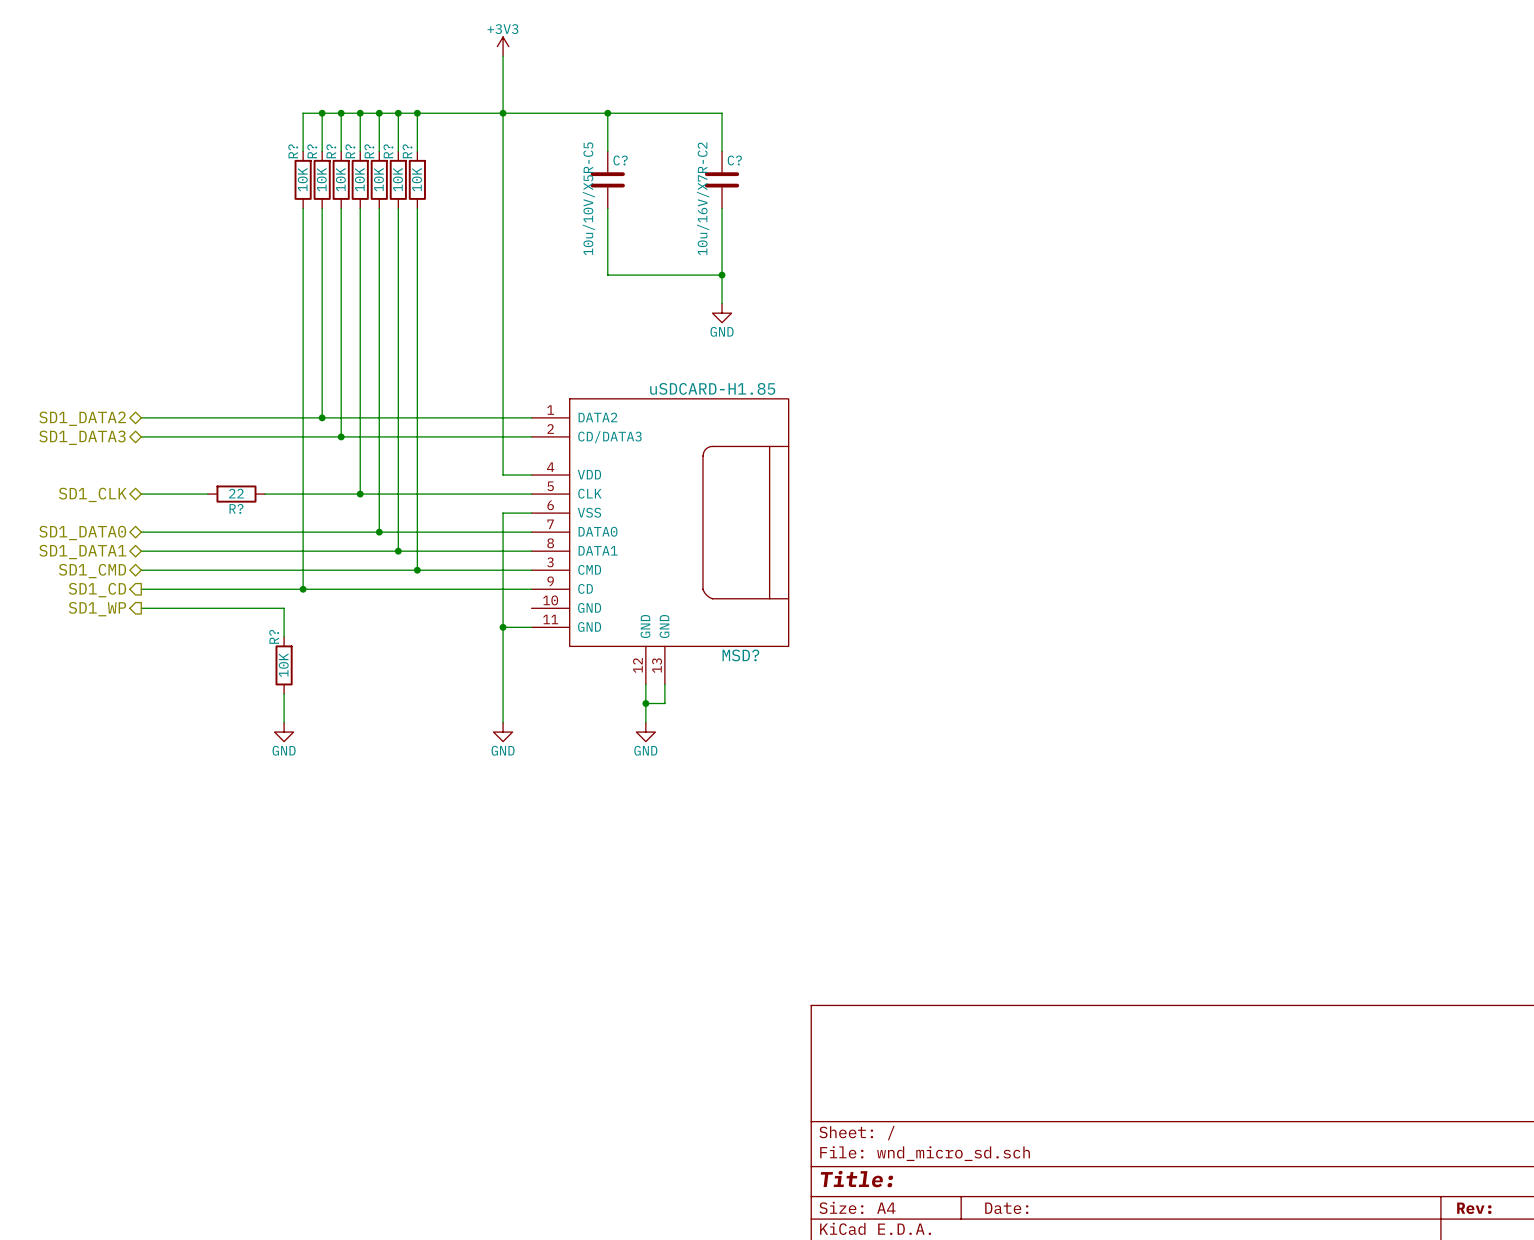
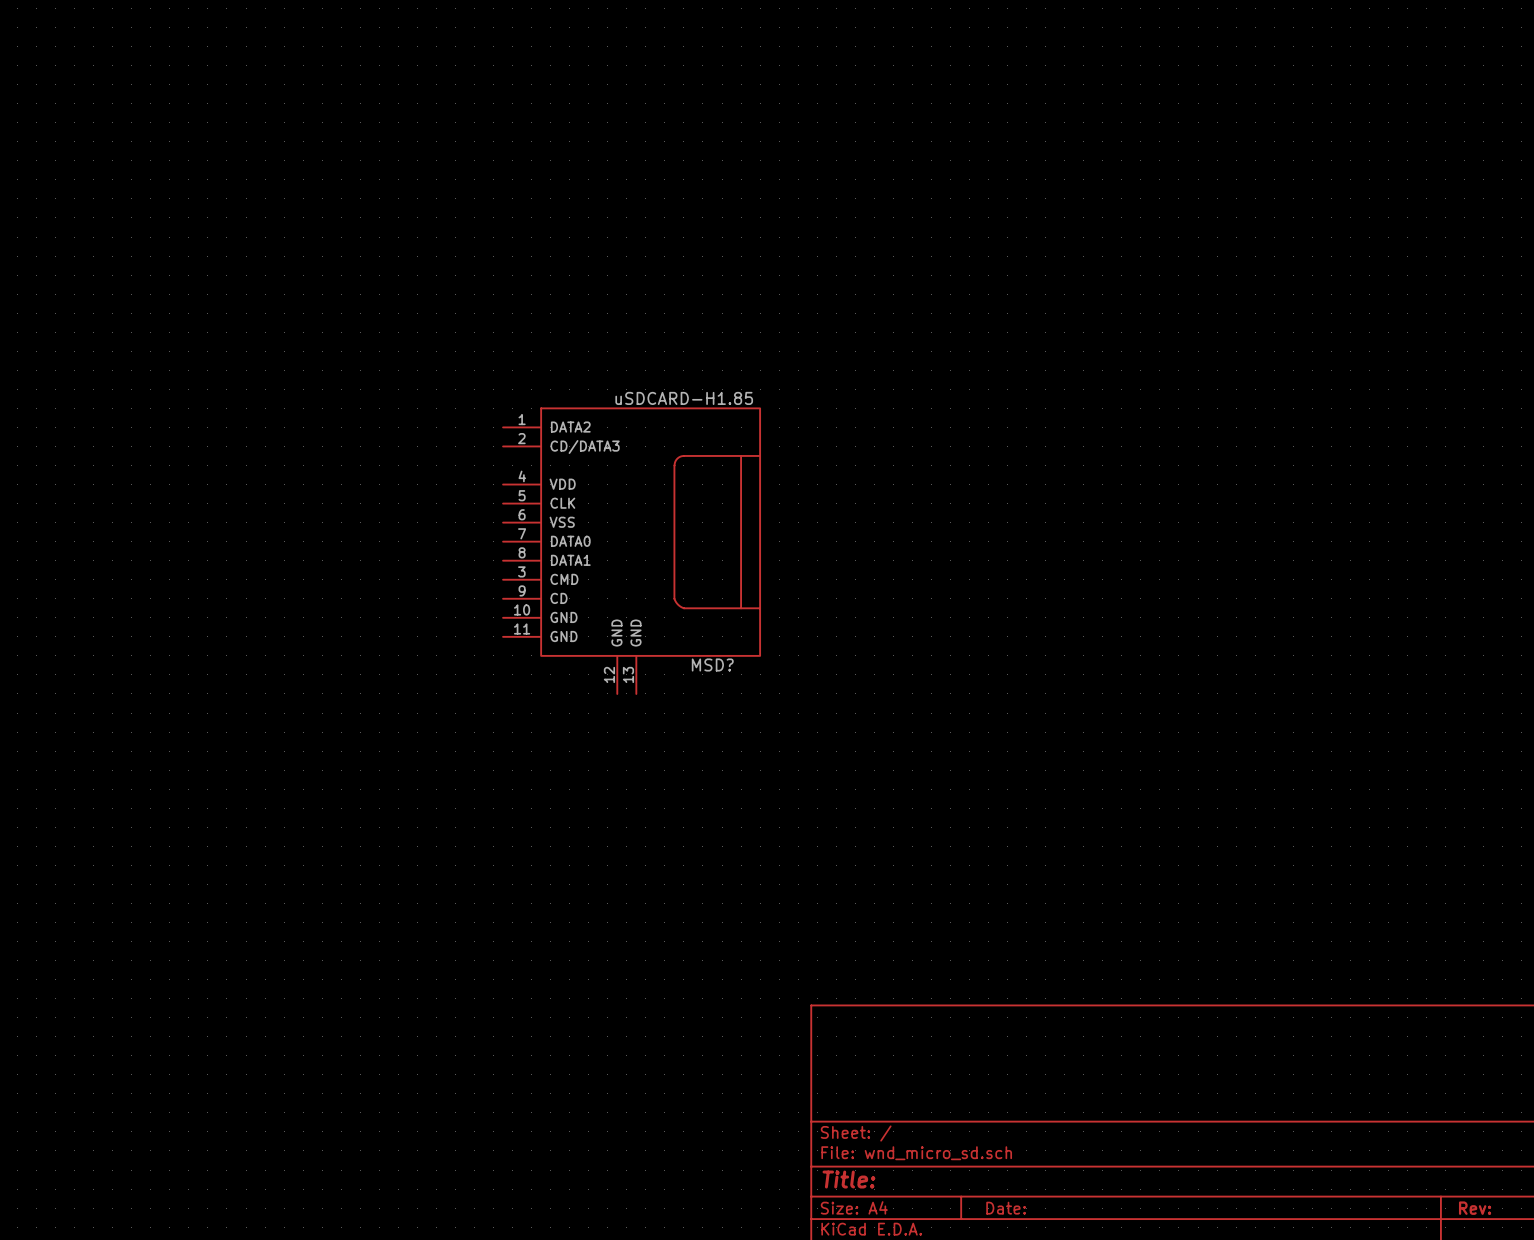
power symbol: +3V3 (503, 46) -> none
wire: (503, 56) (503, 475) (531, 475) -> none
wire: (322, 113) (322, 151) -> none
junction: (322, 113) -> none
wire: (341, 113) (341, 151) -> none
junction: (341, 113) -> none
wire: (360, 113) (360, 151) -> none
junction: (360, 113) -> none
wire: (379, 113) (379, 151) -> none
junction: (379, 113) -> none
wire: (398, 113) (398, 151) -> none
junction: (398, 113) -> none
wire: (417, 113) (417, 151) -> none
junction: (417, 113) -> none
junction: (503, 113) -> none
wire: (607, 113) (607, 151) -> none
junction: (607, 113) -> none
wire: (303, 151) (303, 113) (722, 113) (722, 151) -> none
R?: 10K (303, 179) -> none
R?: 10K (322, 179) -> none
R?: 10K (341, 179) -> none
R?: 10K (360, 179) -> none
R?: 10K (379, 179) -> none
R?: 10K (398, 179) -> none
R?: 10K (417, 179) -> none
C?: 10u/10V/X5R-C5 (607, 179) -> none
C?: 10u/16V/X7R-C2 (722, 179) -> none
wire: (303, 208) (303, 589) -> none
wire: (322, 208) (322, 417) -> none
wire: (341, 208) (341, 436) -> none
wire: (360, 208) (360, 494) -> none
wire: (379, 208) (379, 532) -> none
wire: (398, 208) (398, 551) -> none
wire: (417, 208) (417, 570) -> none
wire: (607, 208) (607, 275) (722, 275) -> none
wire: (722, 208) (722, 303) -> none
junction: (722, 275) -> none
power symbol: GND (722, 313) -> none
wire: (141, 417) (531, 417) -> none
junction: (322, 417) -> none
hierarchical label: SD1_DATA2 (82, 418) -> none
wire: (141, 436) (531, 436) -> none
junction: (341, 436) -> none
hierarchical label: SD1_DATA3 (82, 437) -> none
hierarchical label: SD1_CLK (92, 494) -> none
wire: (141, 494) (207, 494) -> none
R?: 22 (236, 494) -> none
wire: (265, 494) (531, 494) -> none
junction: (360, 494) -> none
wire: (531, 513) (503, 513) (503, 722) -> none
hierarchical label: SD1_DATA0 (82, 532) -> none
wire: (141, 532) (531, 532) -> none
junction: (379, 532) -> none
MSD? position: (660, 541) -> (631, 551)
wire: (141, 551) (531, 551) -> none
junction: (398, 551) -> none
hierarchical label: SD1_DATA1 (82, 552) -> none
wire: (141, 570) (531, 570) -> none
junction: (417, 570) -> none
hierarchical label: SD1_CMD (92, 571) -> none
wire: (141, 589) (531, 589) -> none
junction: (303, 589) -> none
hierarchical label: SD1_CD (97, 590) -> none
wire: (141, 608) (284, 608) (284, 636) -> none
hierarchical label: SD1_WP (97, 609) -> none
wire: (503, 627) (531, 627) -> none
junction: (503, 627) -> none
R?: 10K (284, 665) -> none
wire: (645, 684) (645, 722) -> none
wire: (664, 684) (664, 703) (645, 703) -> none
wire: (284, 693) (284, 722) -> none
junction: (645, 703) -> none
power symbol: GND (284, 732) -> none
power symbol: GND (503, 732) -> none
power symbol: GND (645, 732) -> none

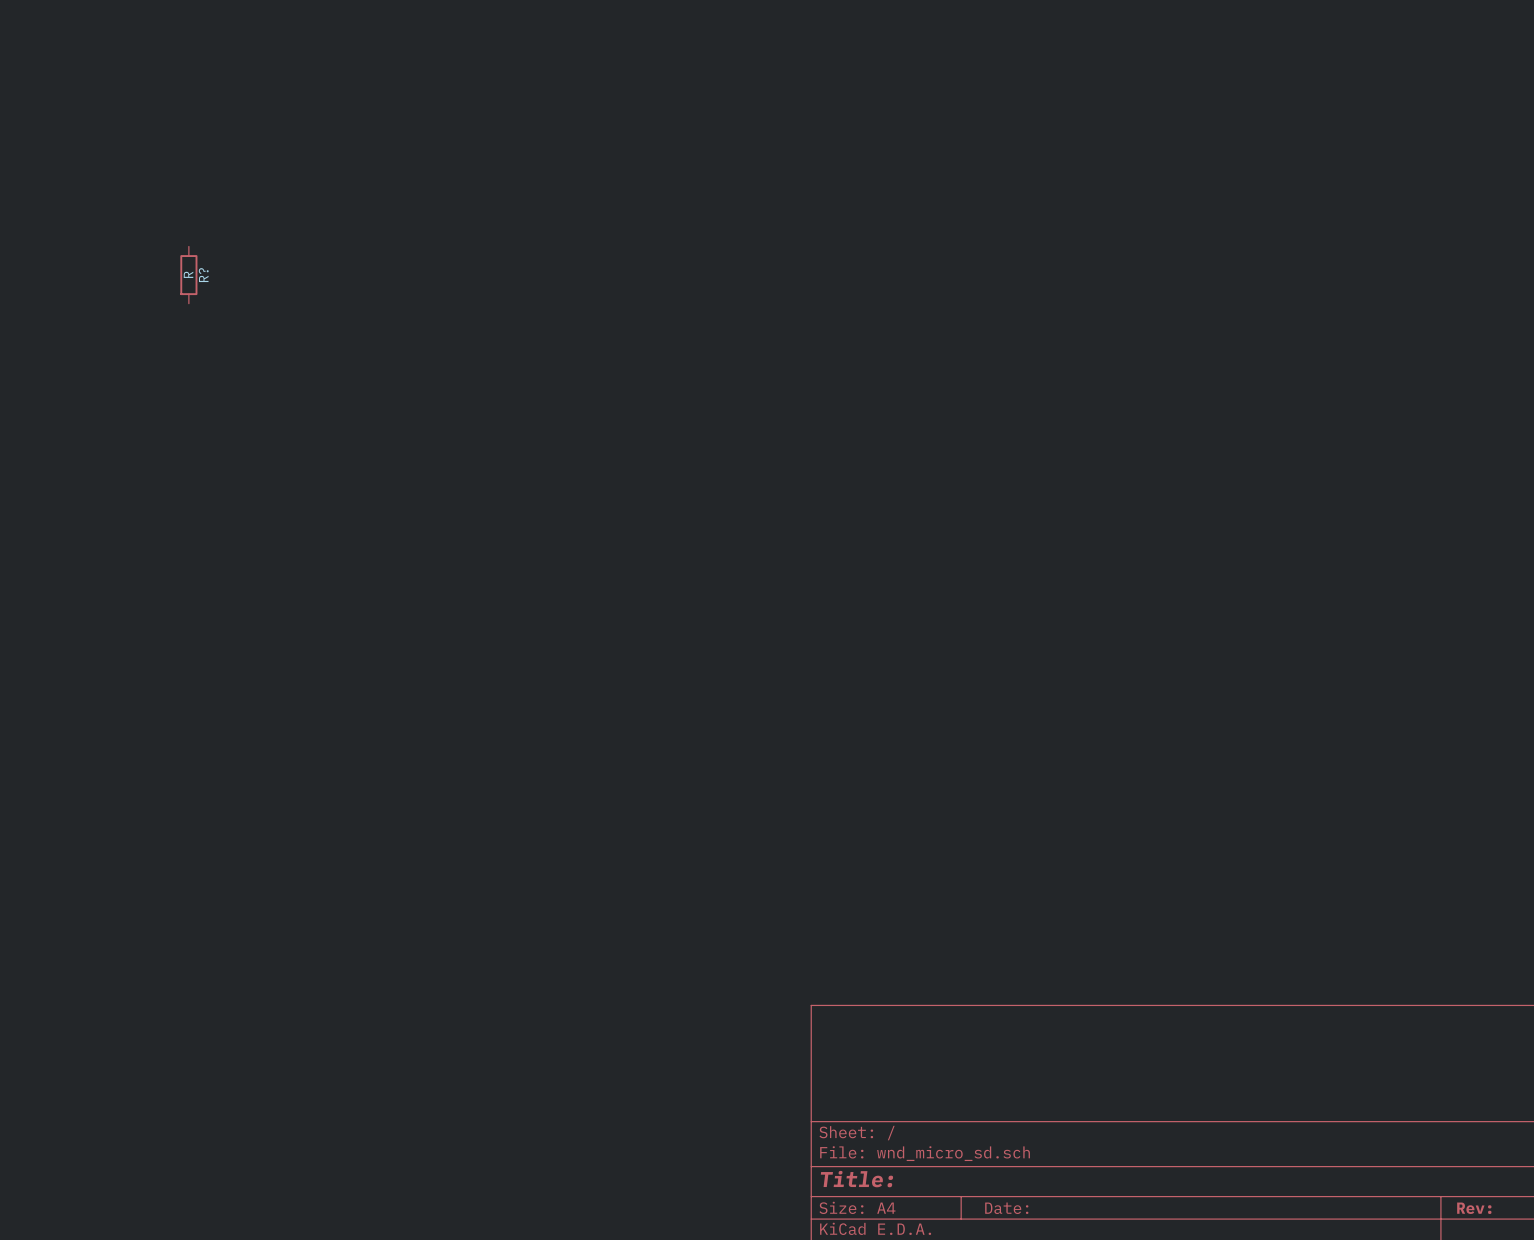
R?: none -> R (188, 275)
MSD?: uSDCARD-H1.85 (631, 551) -> none

